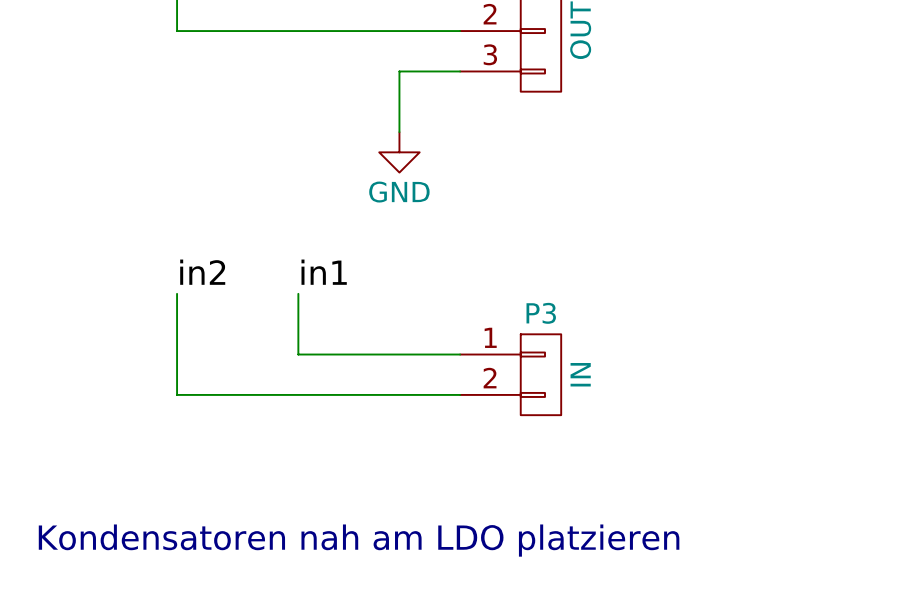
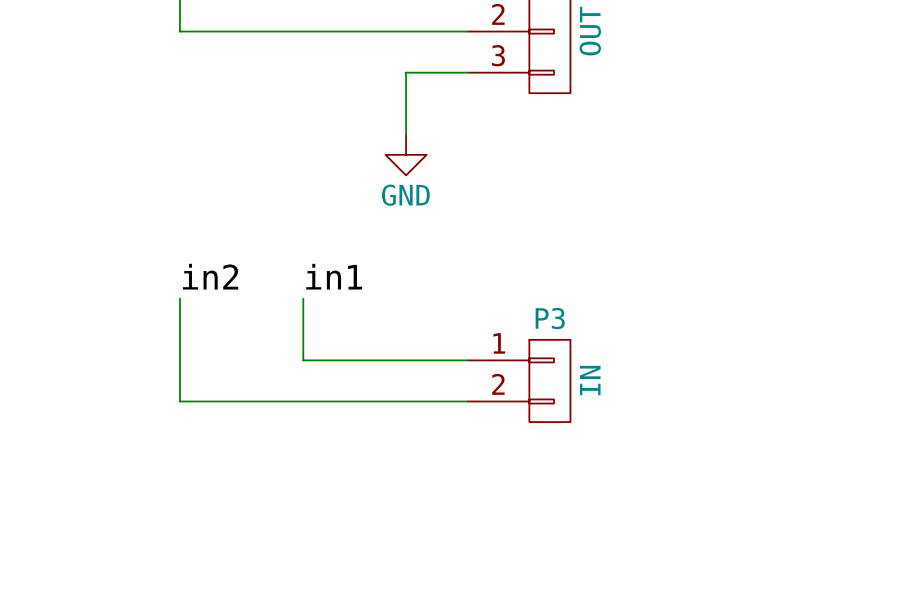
text: Kondensatoren nah am LDO platzieren (359, 540) -> none

